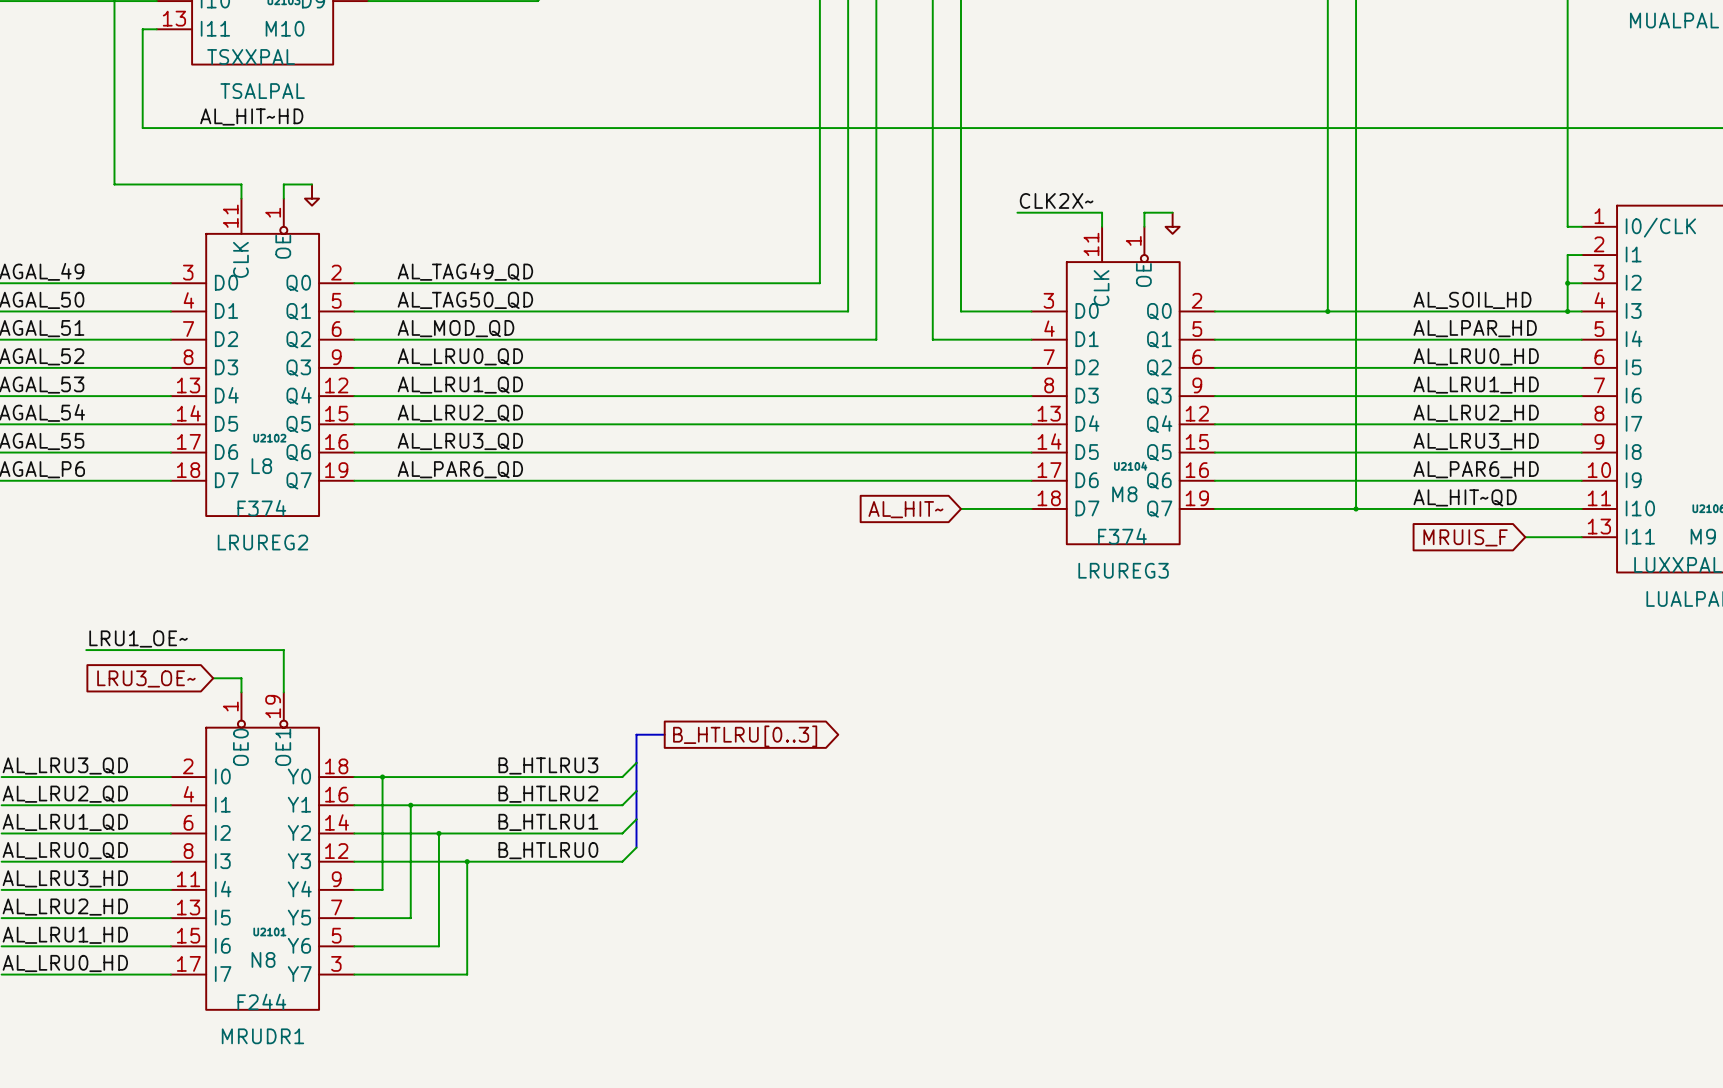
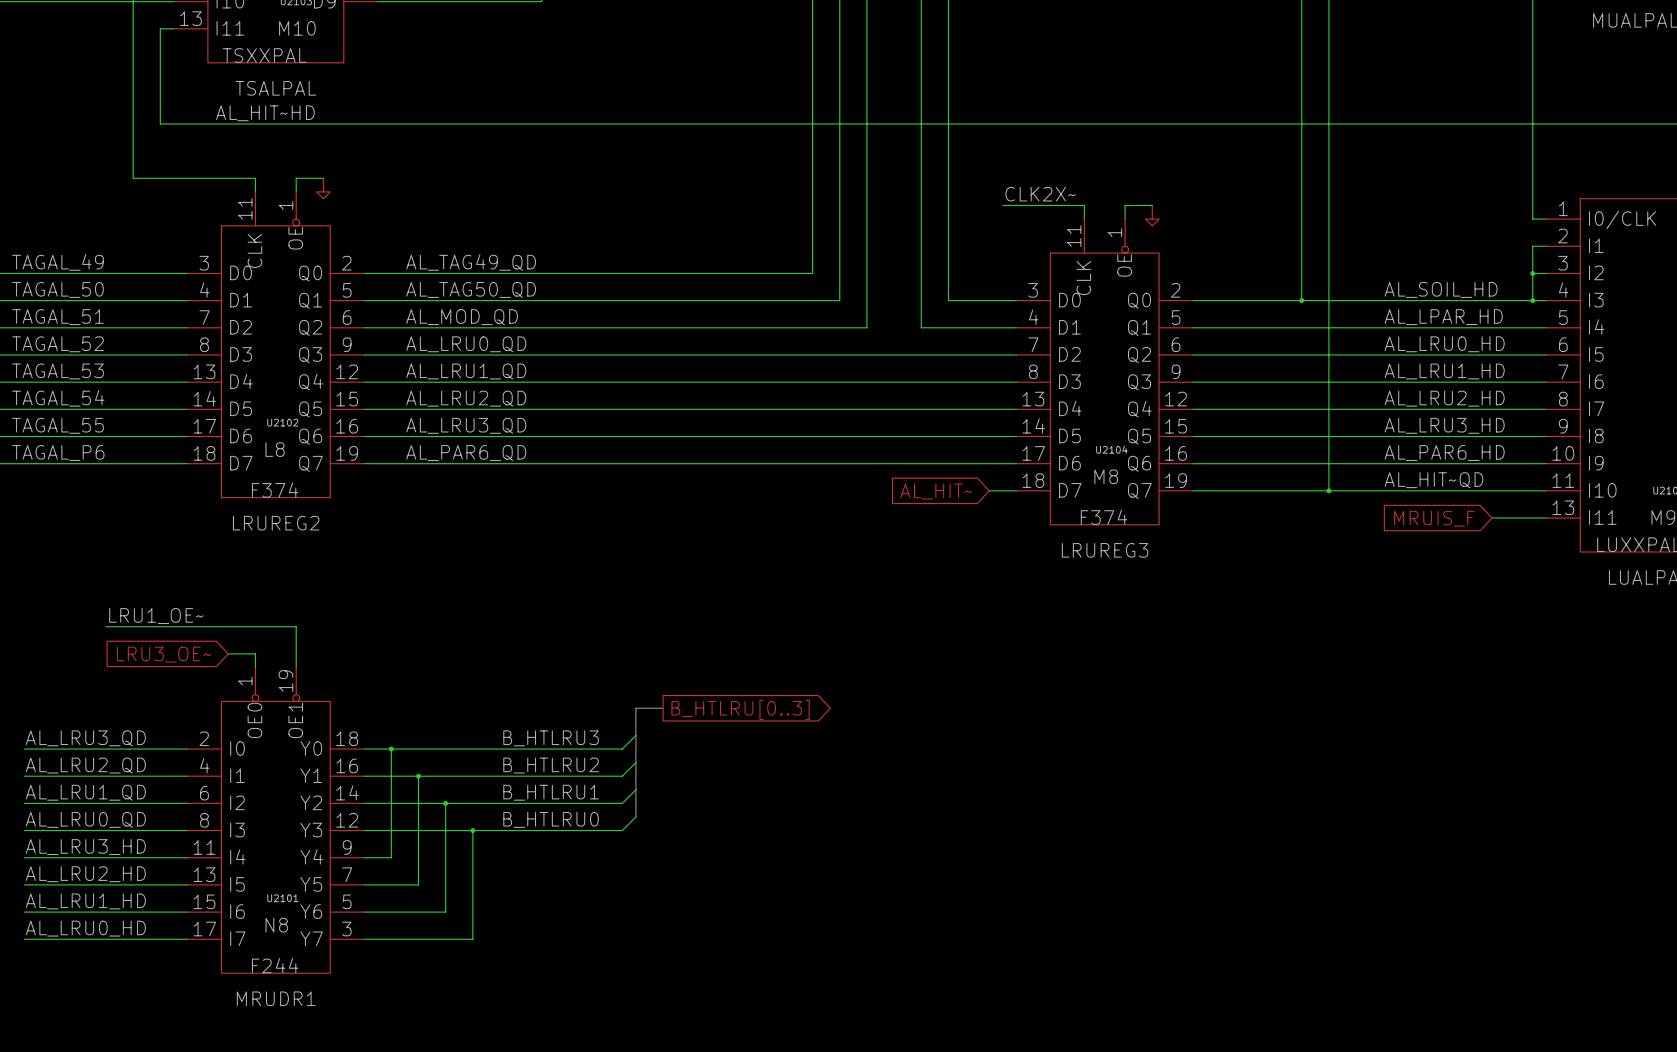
wire: (960, 508) (1003, 508) -> none
global label position: AL_HIT~ (905, 509) -> AL_HIT~ (936, 491)

